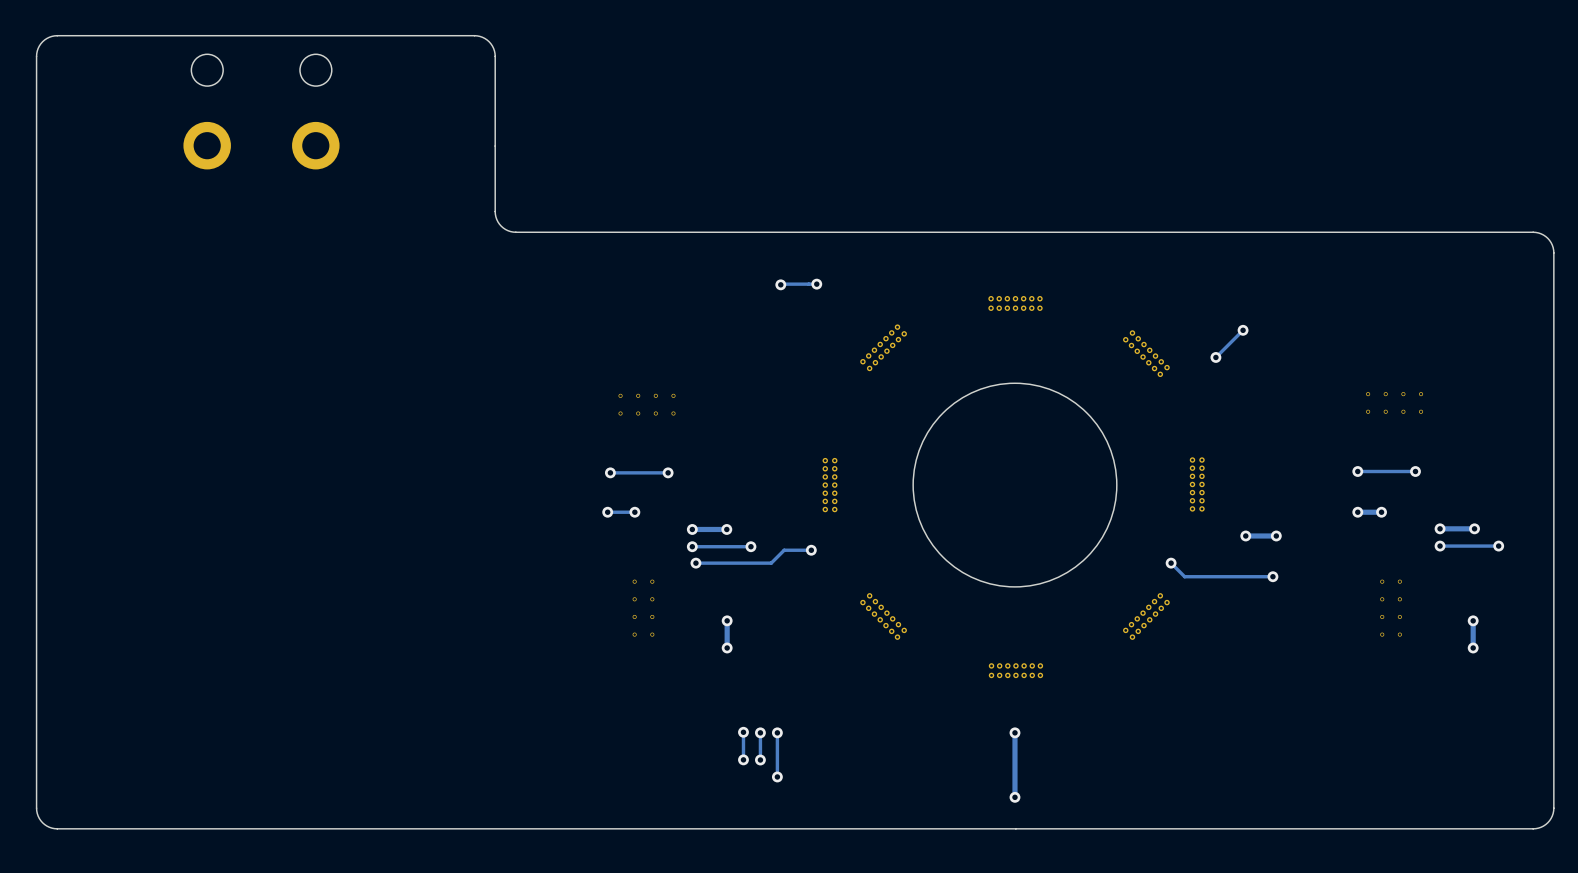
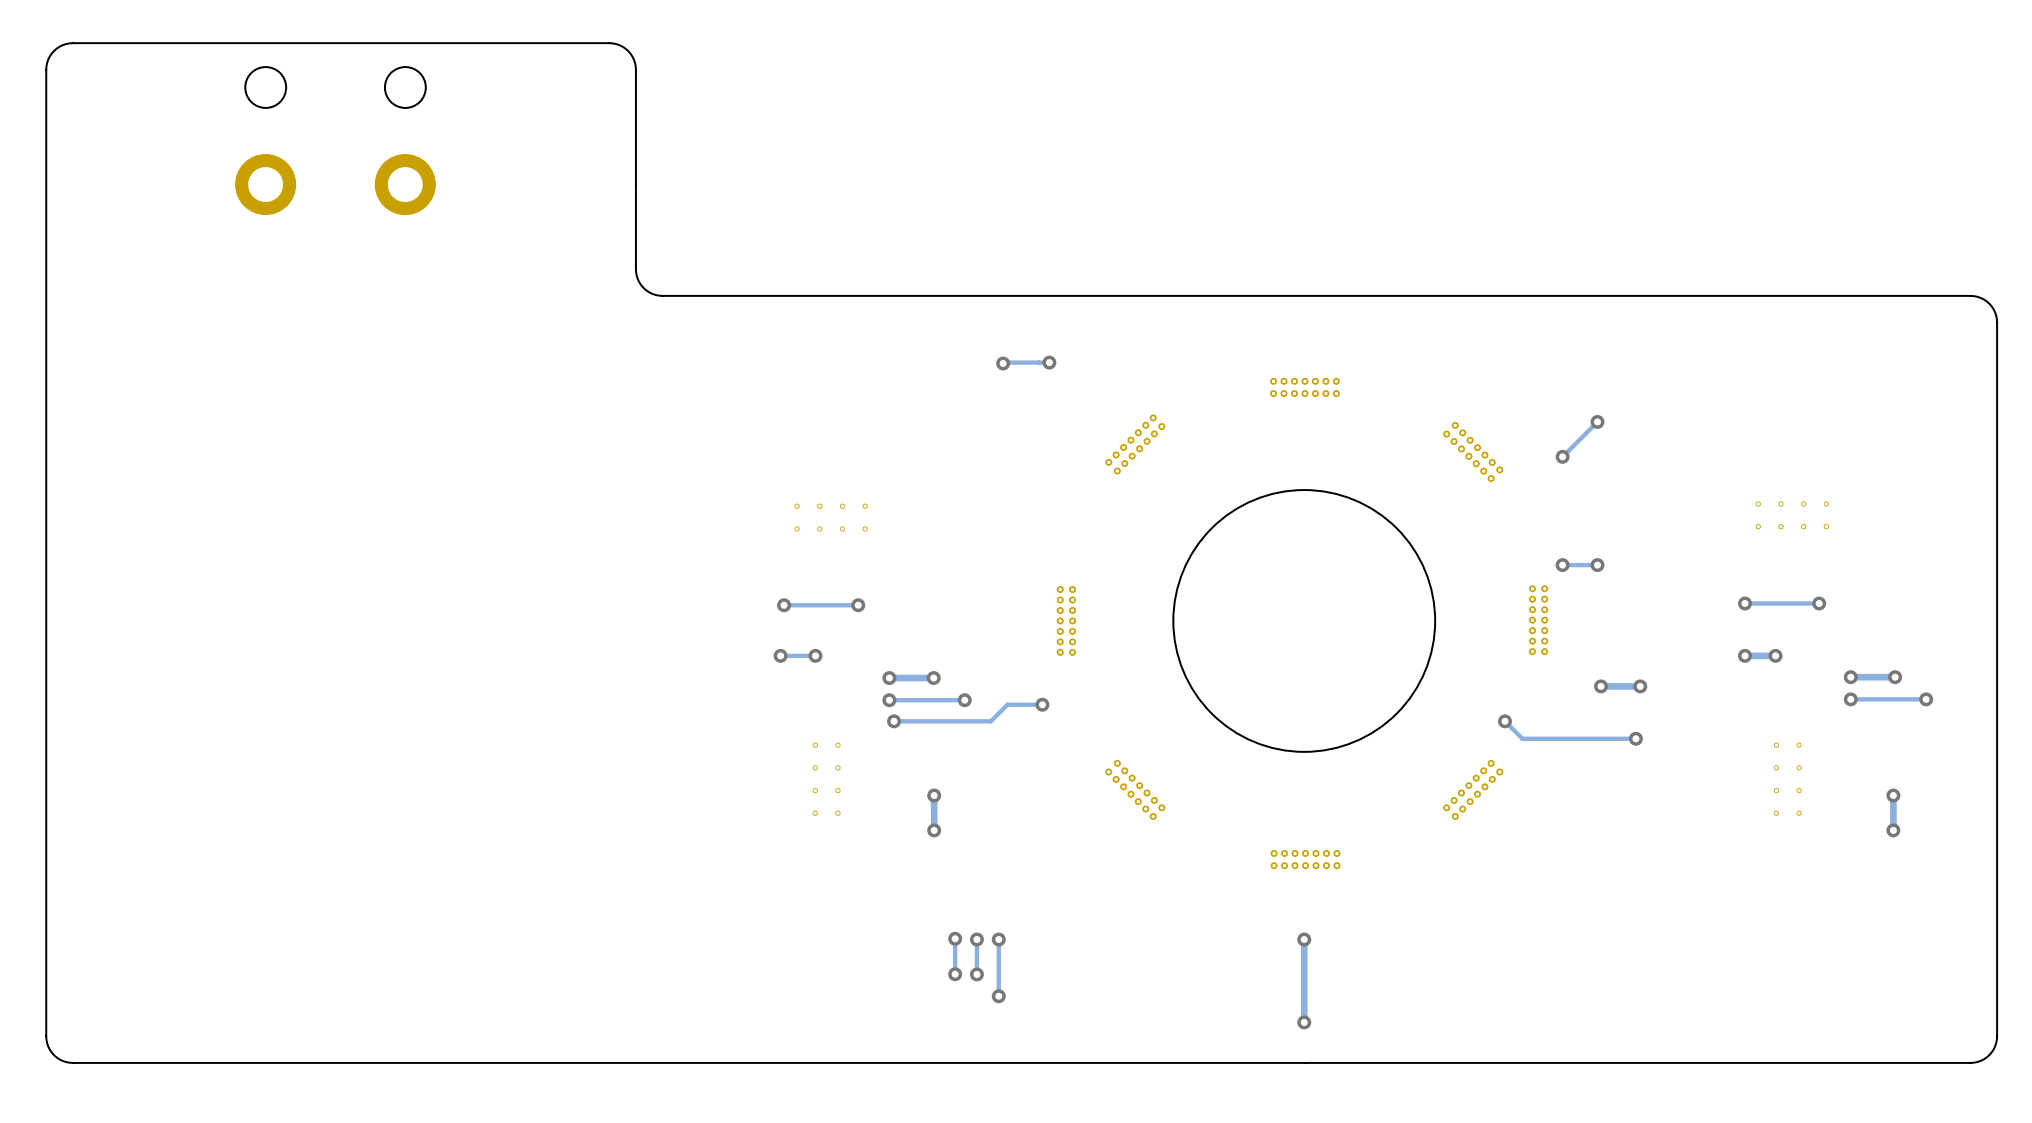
via: none -> (1562, 565)
track: none -> (1597, 565) (1562, 565)
via: none -> (1597, 565)

